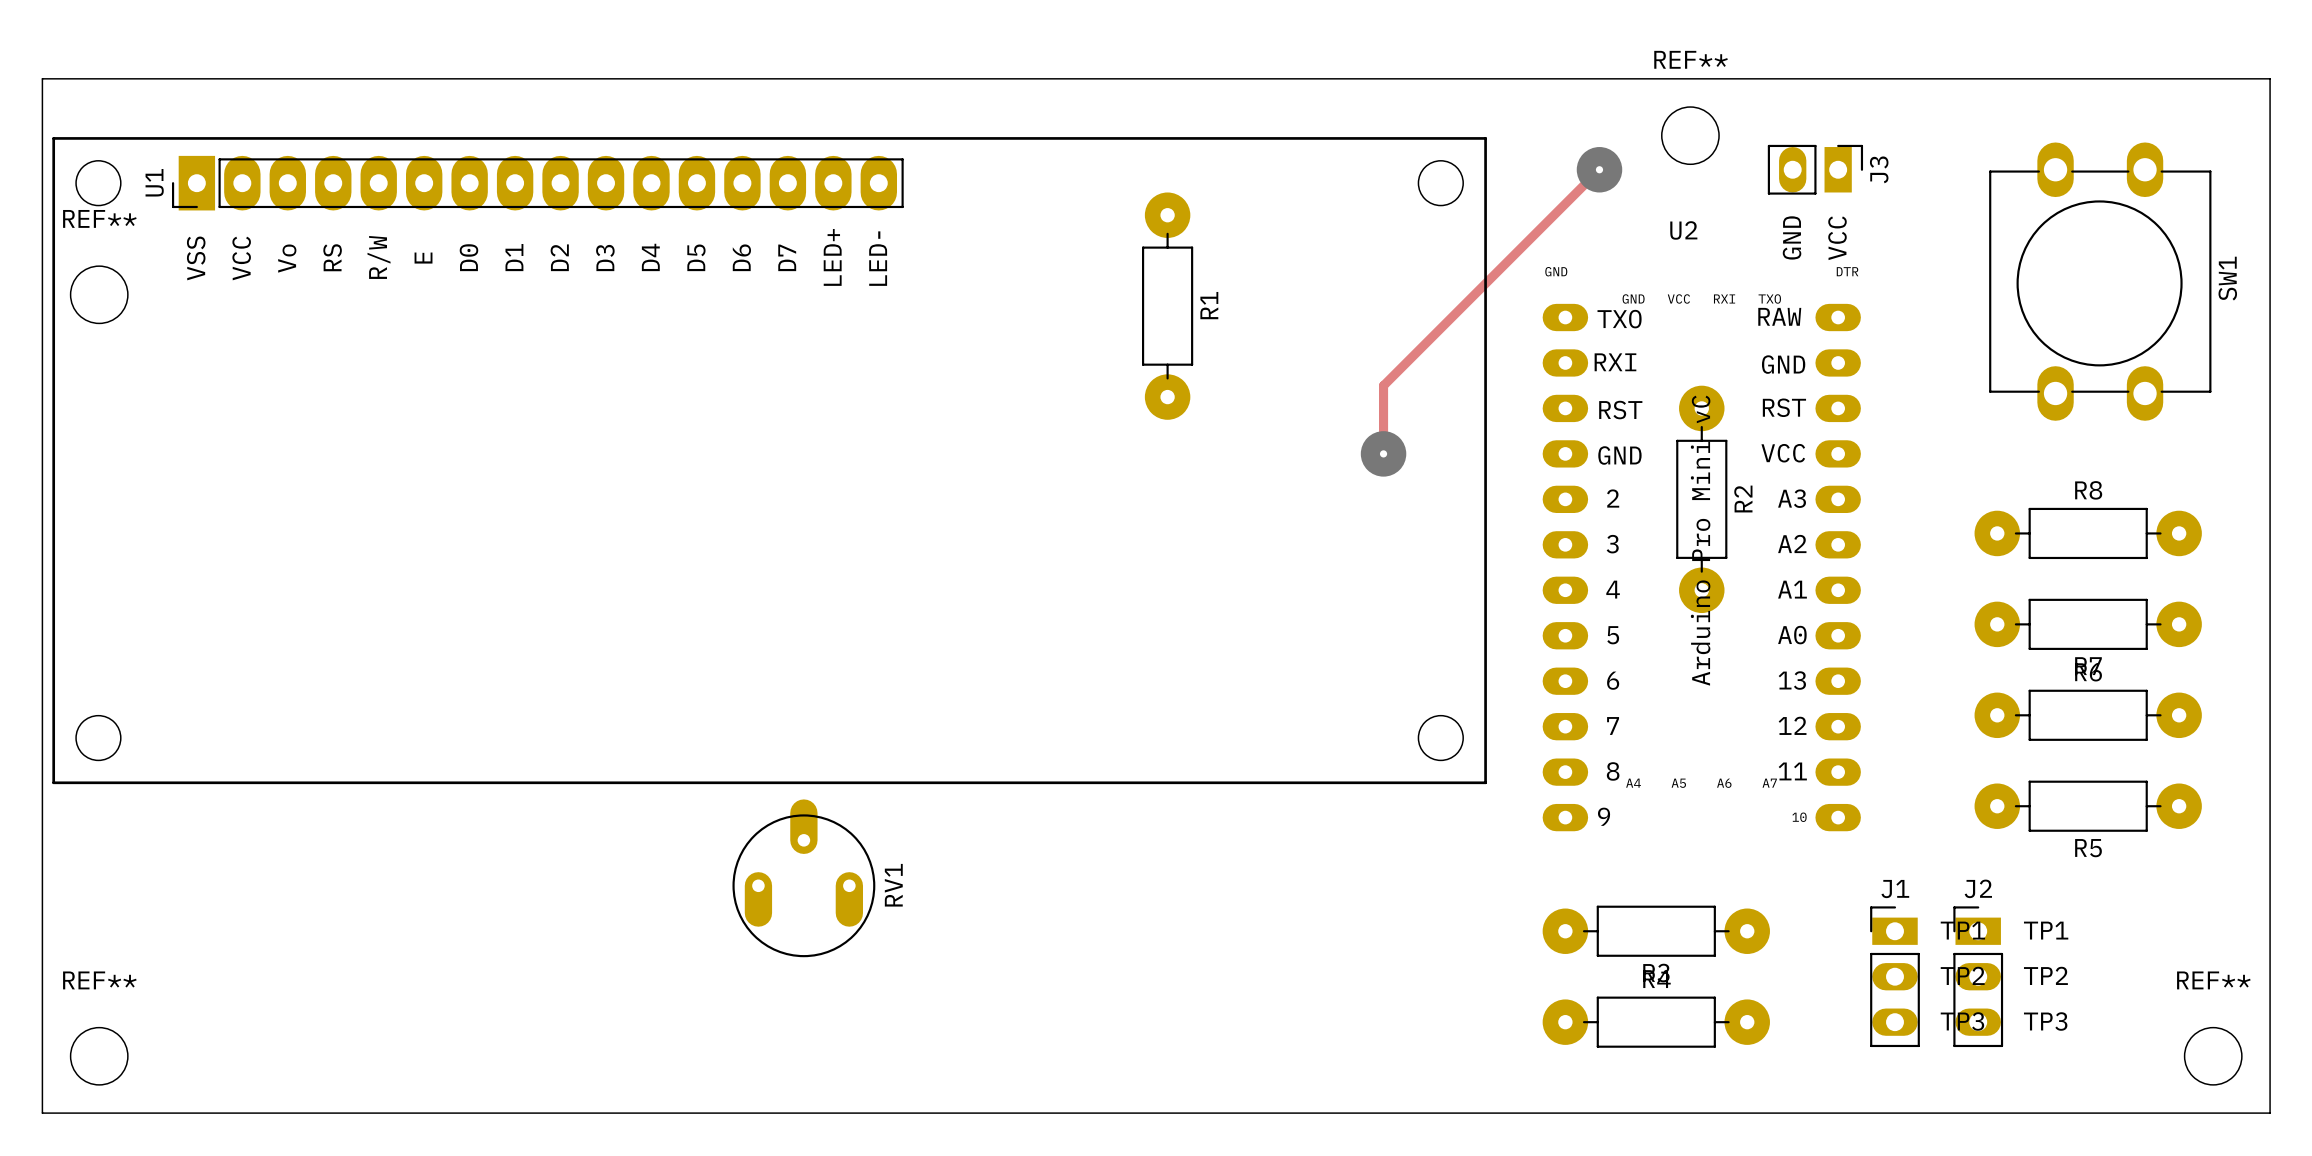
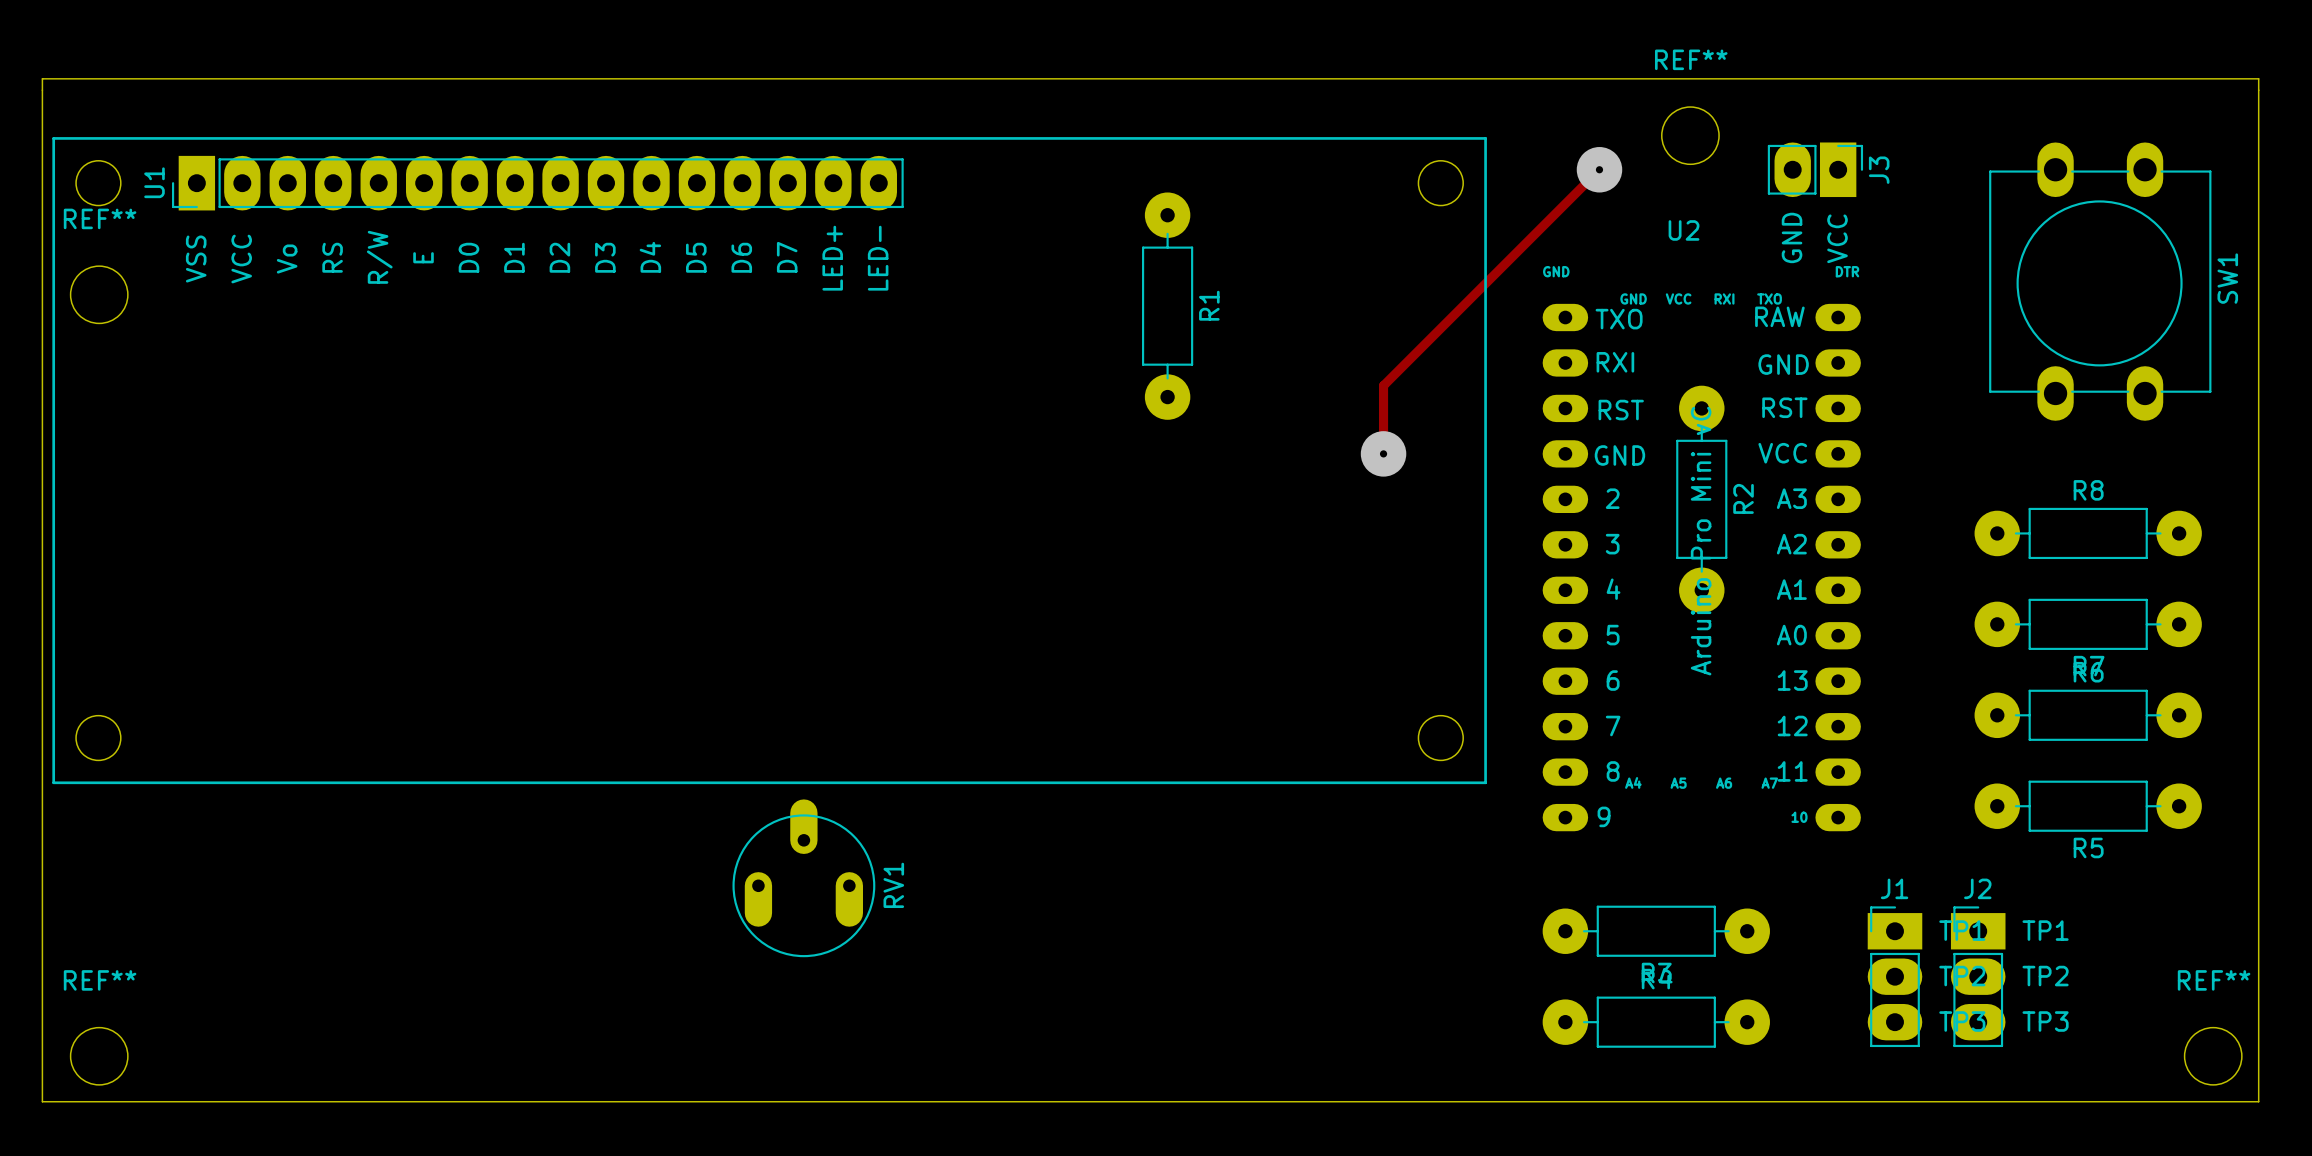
board edge: (2258, 78) (2270, 78) (2270, 1113) (42, 1113) (42, 1101) -> (2258, 78) (2258, 1101) (42, 1101)
J3 footprint: [1767, 144, 1864, 195] -> [1767, 142, 1864, 198]
J1 footprint: [1870, 906, 1920, 1048] -> [1867, 906, 1923, 1048]
J2 footprint: [1953, 906, 2004, 1048] -> [1950, 906, 2006, 1048]

